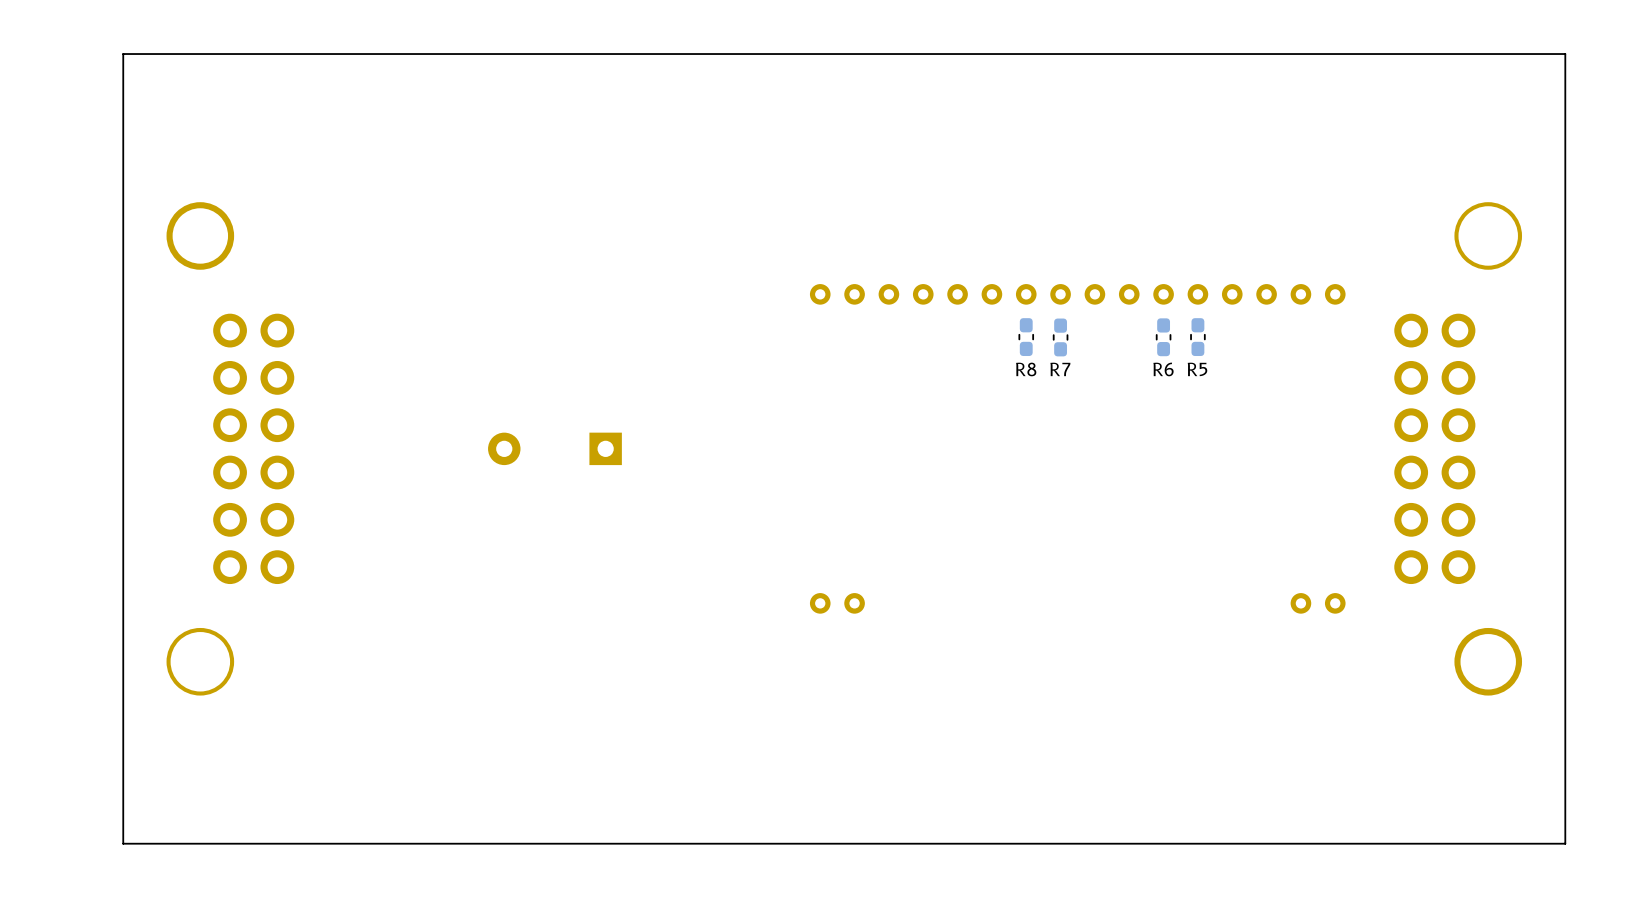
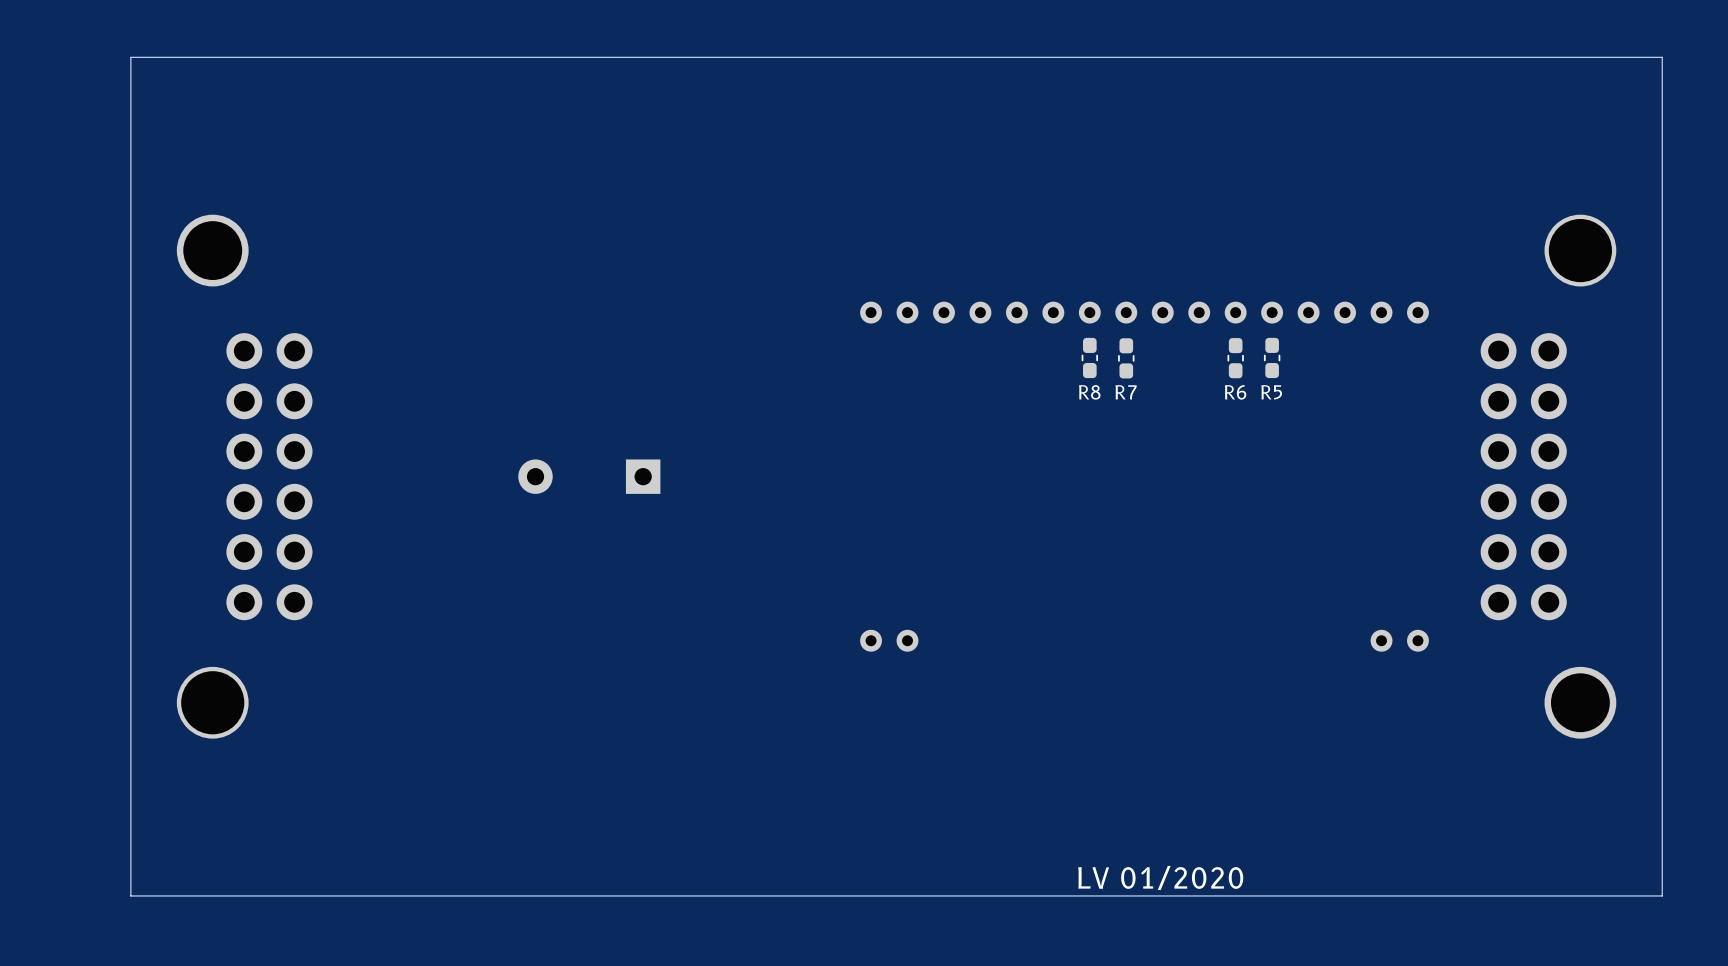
text: none -> LV 01/2020 (1160, 877)

